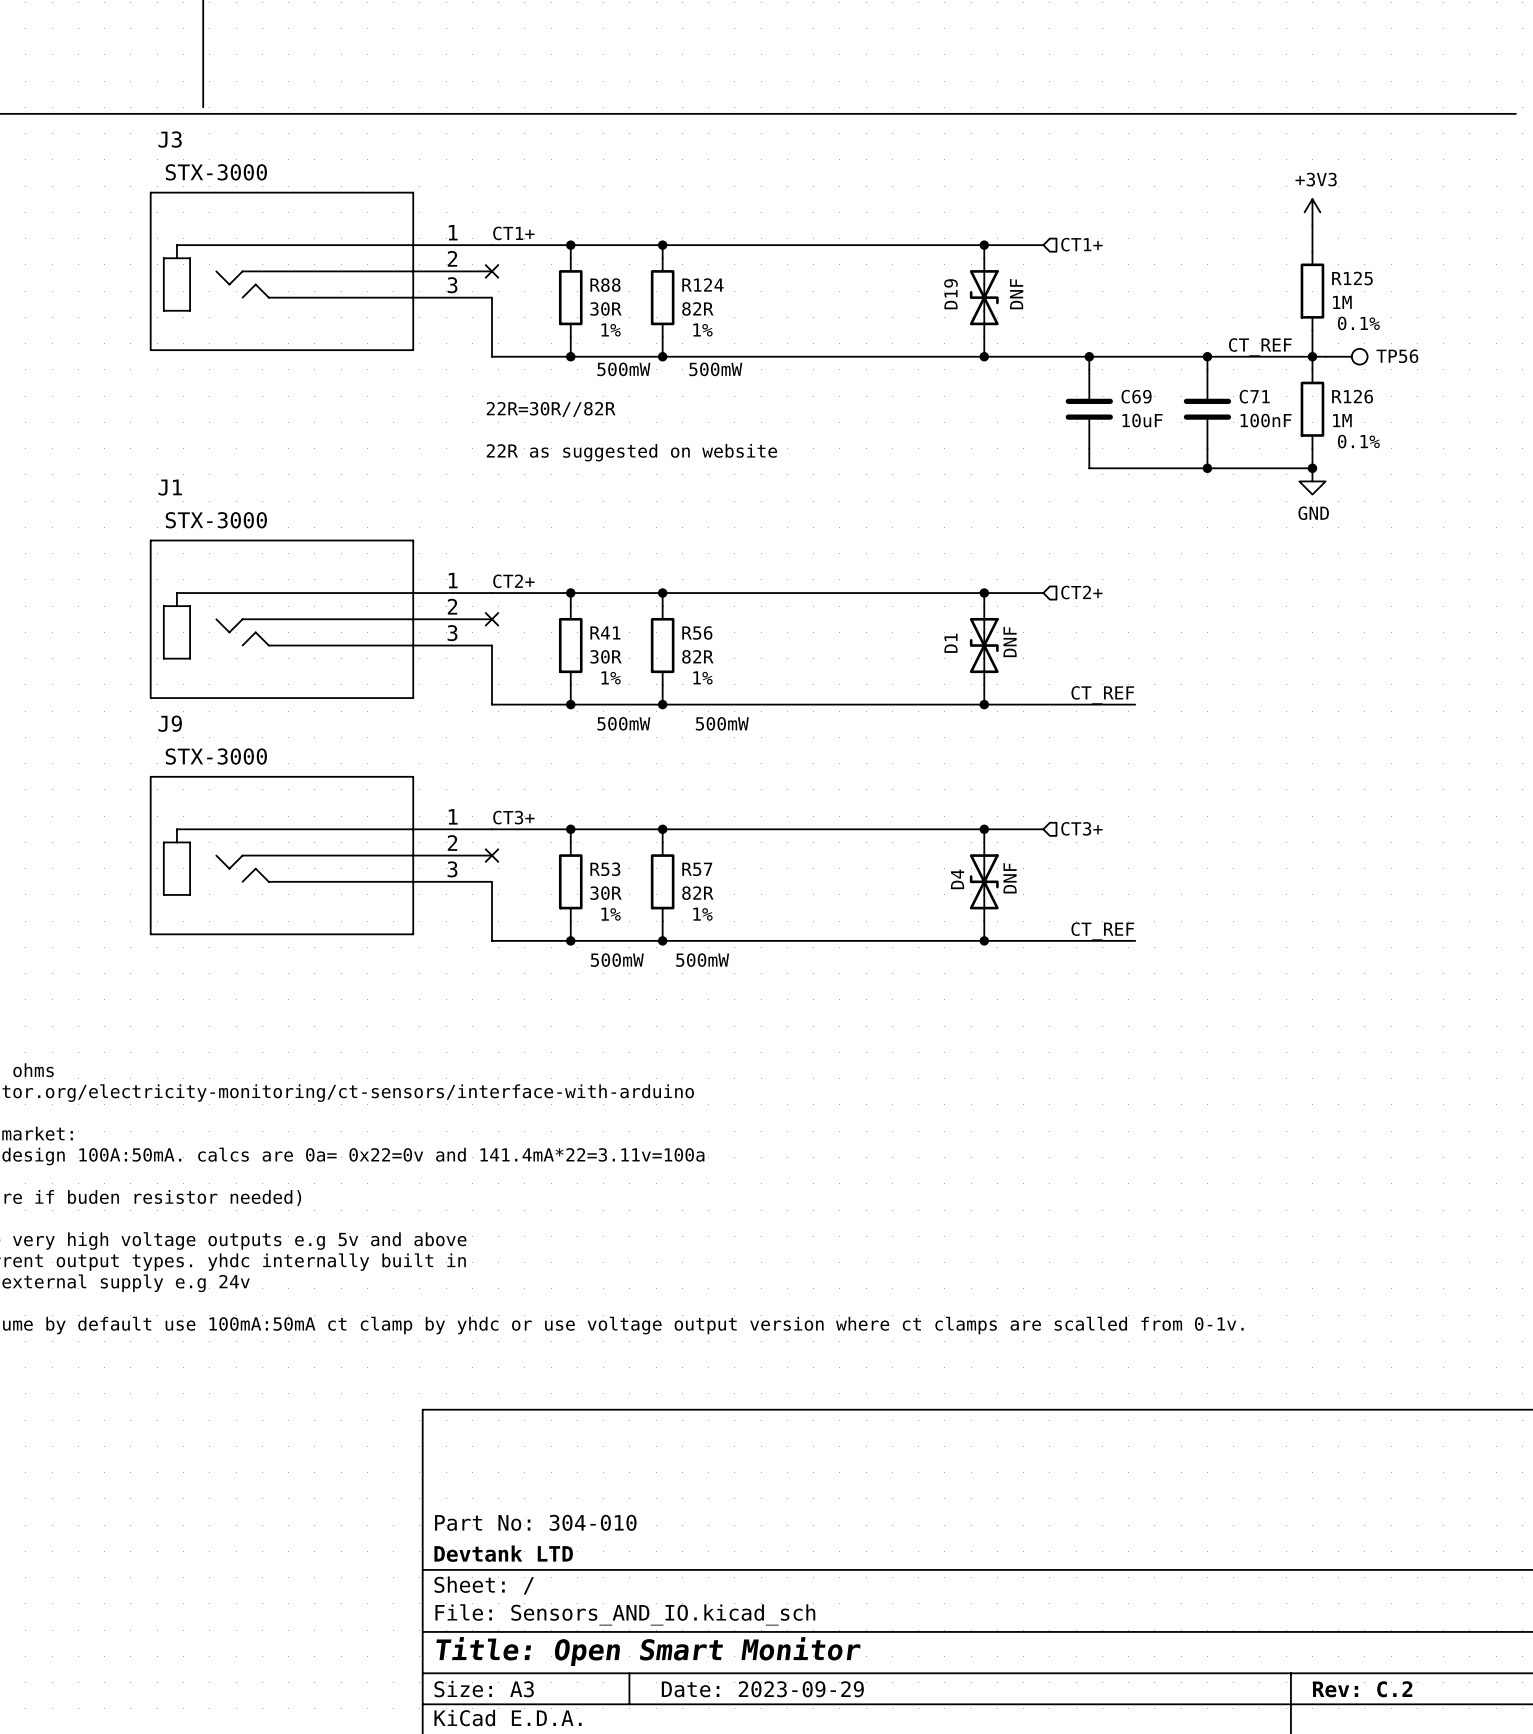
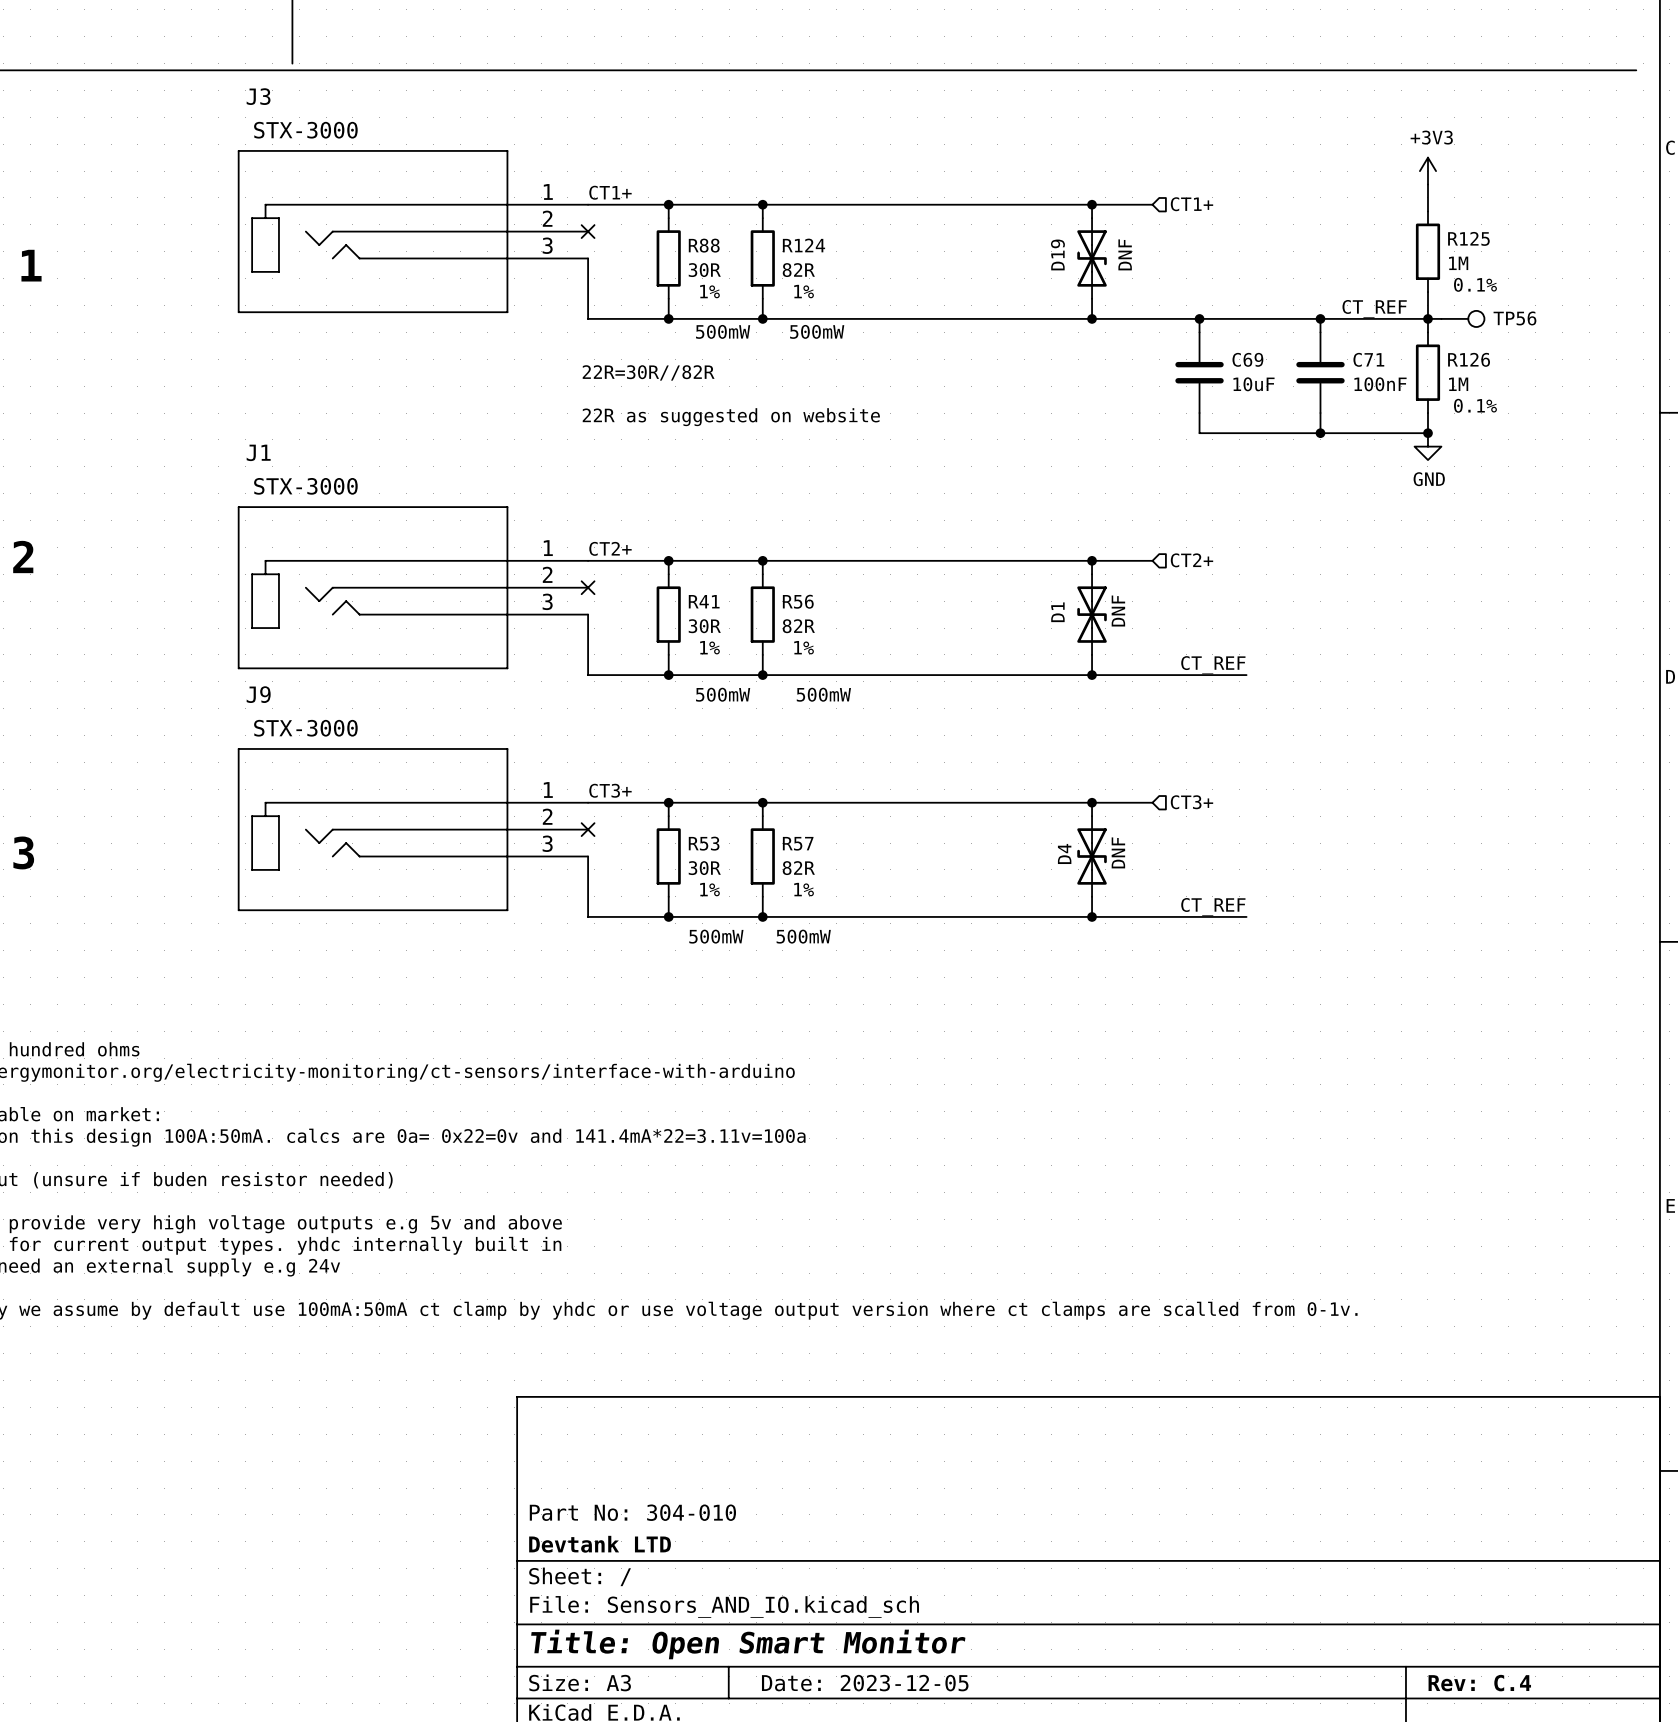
title block: Date: 2023-09-29 (762, 1689) -> Date: 2023-12-05 (865, 1683)
title block: Rev: C.2 (1362, 1689) -> Rev: C.4 (1479, 1683)

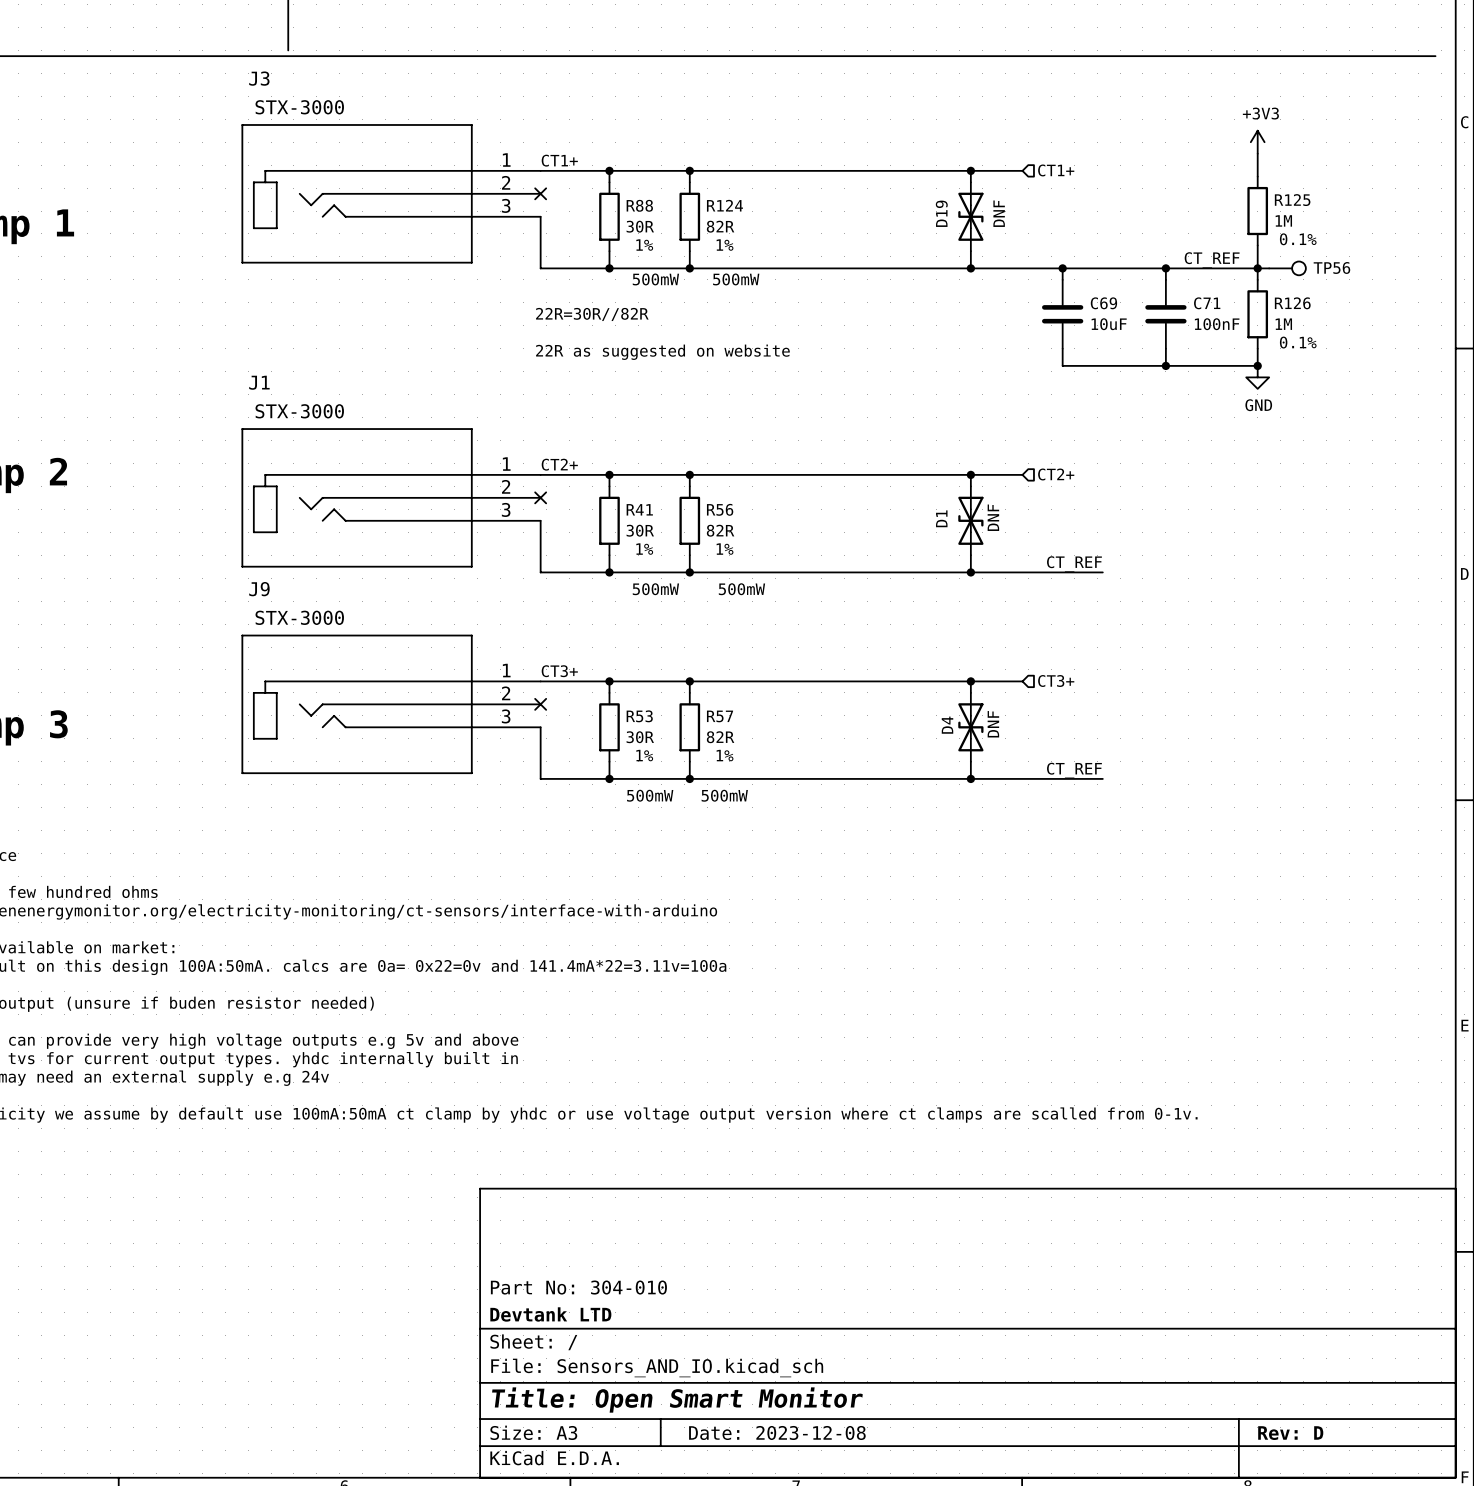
title block: Date: 2023-12-05 (865, 1683) -> Date: 2023-12-08 (777, 1432)
title block: Rev: C.4 (1479, 1683) -> Rev: D (1290, 1433)

